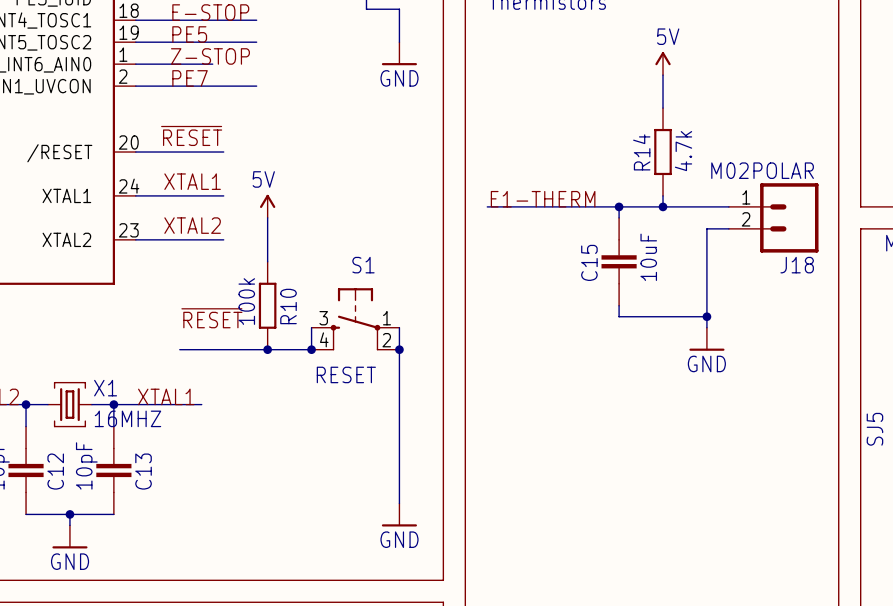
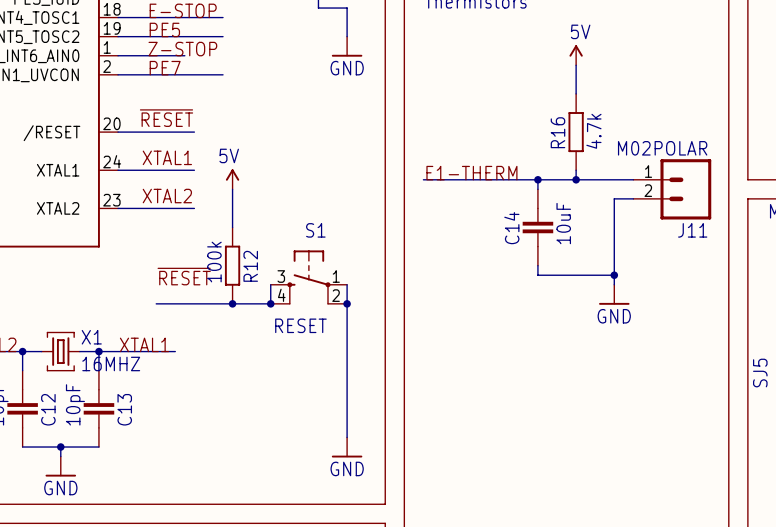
R14 name: R14 (641, 152) -> R16 (557, 132)
C15 name: C15 (589, 262) -> C14 (511, 228)
J18 name: J18 (797, 265) -> J11 (692, 230)
R10 name: R10 (288, 306) -> R12 (250, 266)

